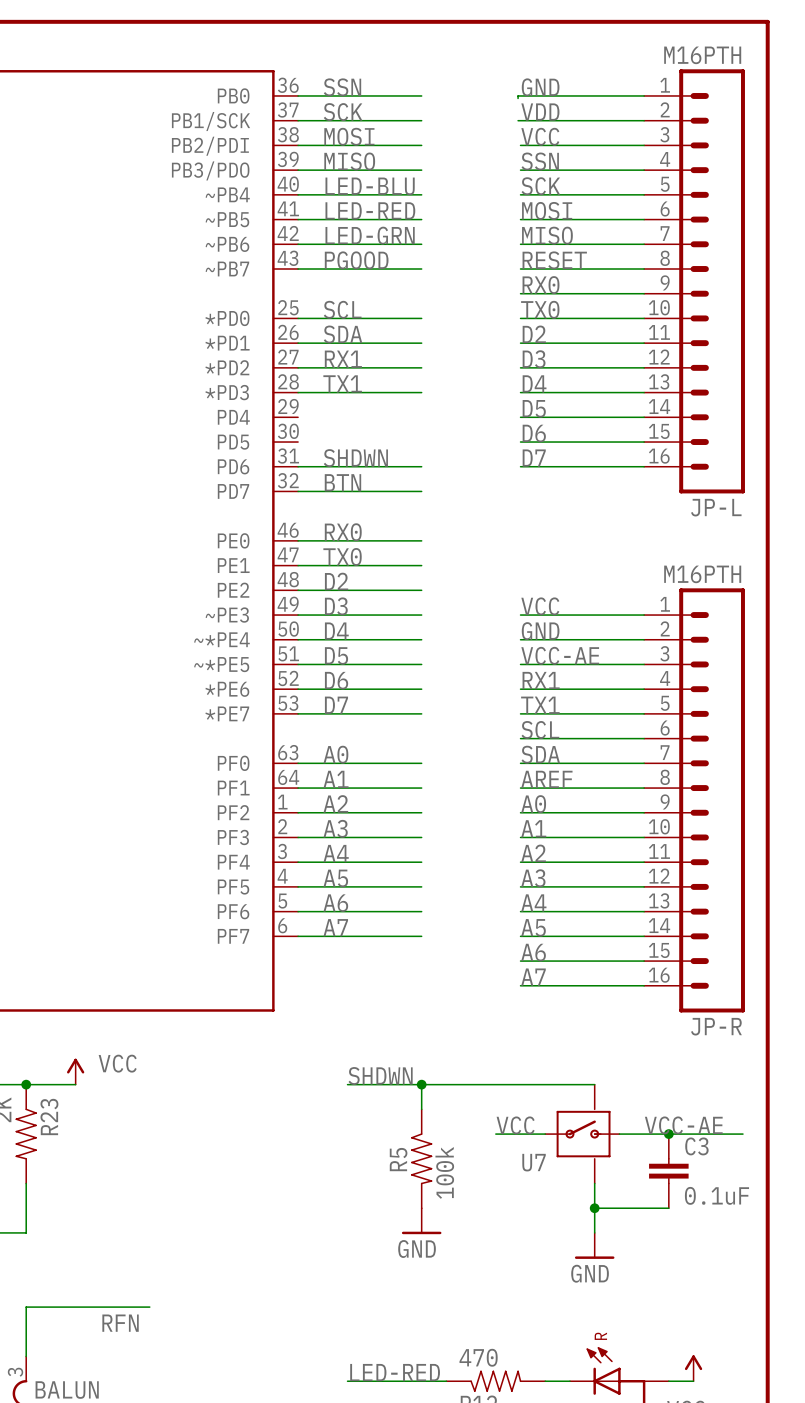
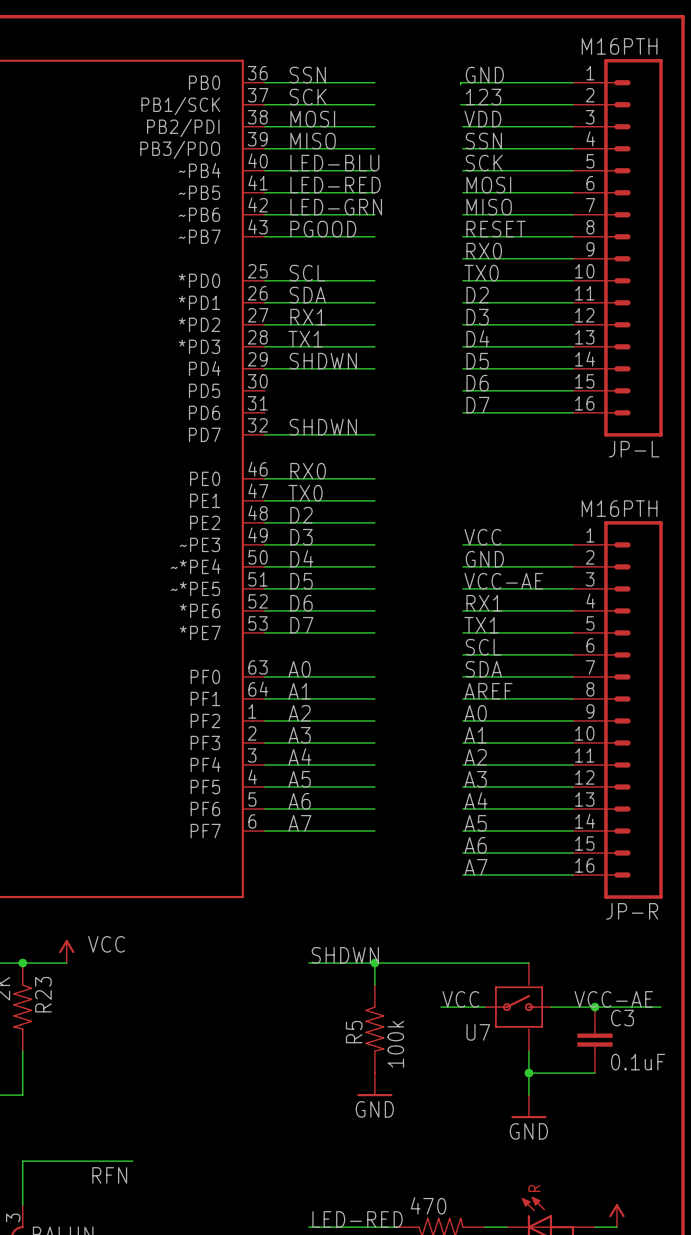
label: VDD (540, 112) -> 123 (483, 97)
label: VCC (540, 136) -> VDD (482, 119)
label position: SHDWN (355, 458) -> SHDWN (323, 361)
wire: (298, 466) (421, 466) -> (264, 368) (374, 368)
label: BTN (342, 482) -> SHDWN (323, 427)

